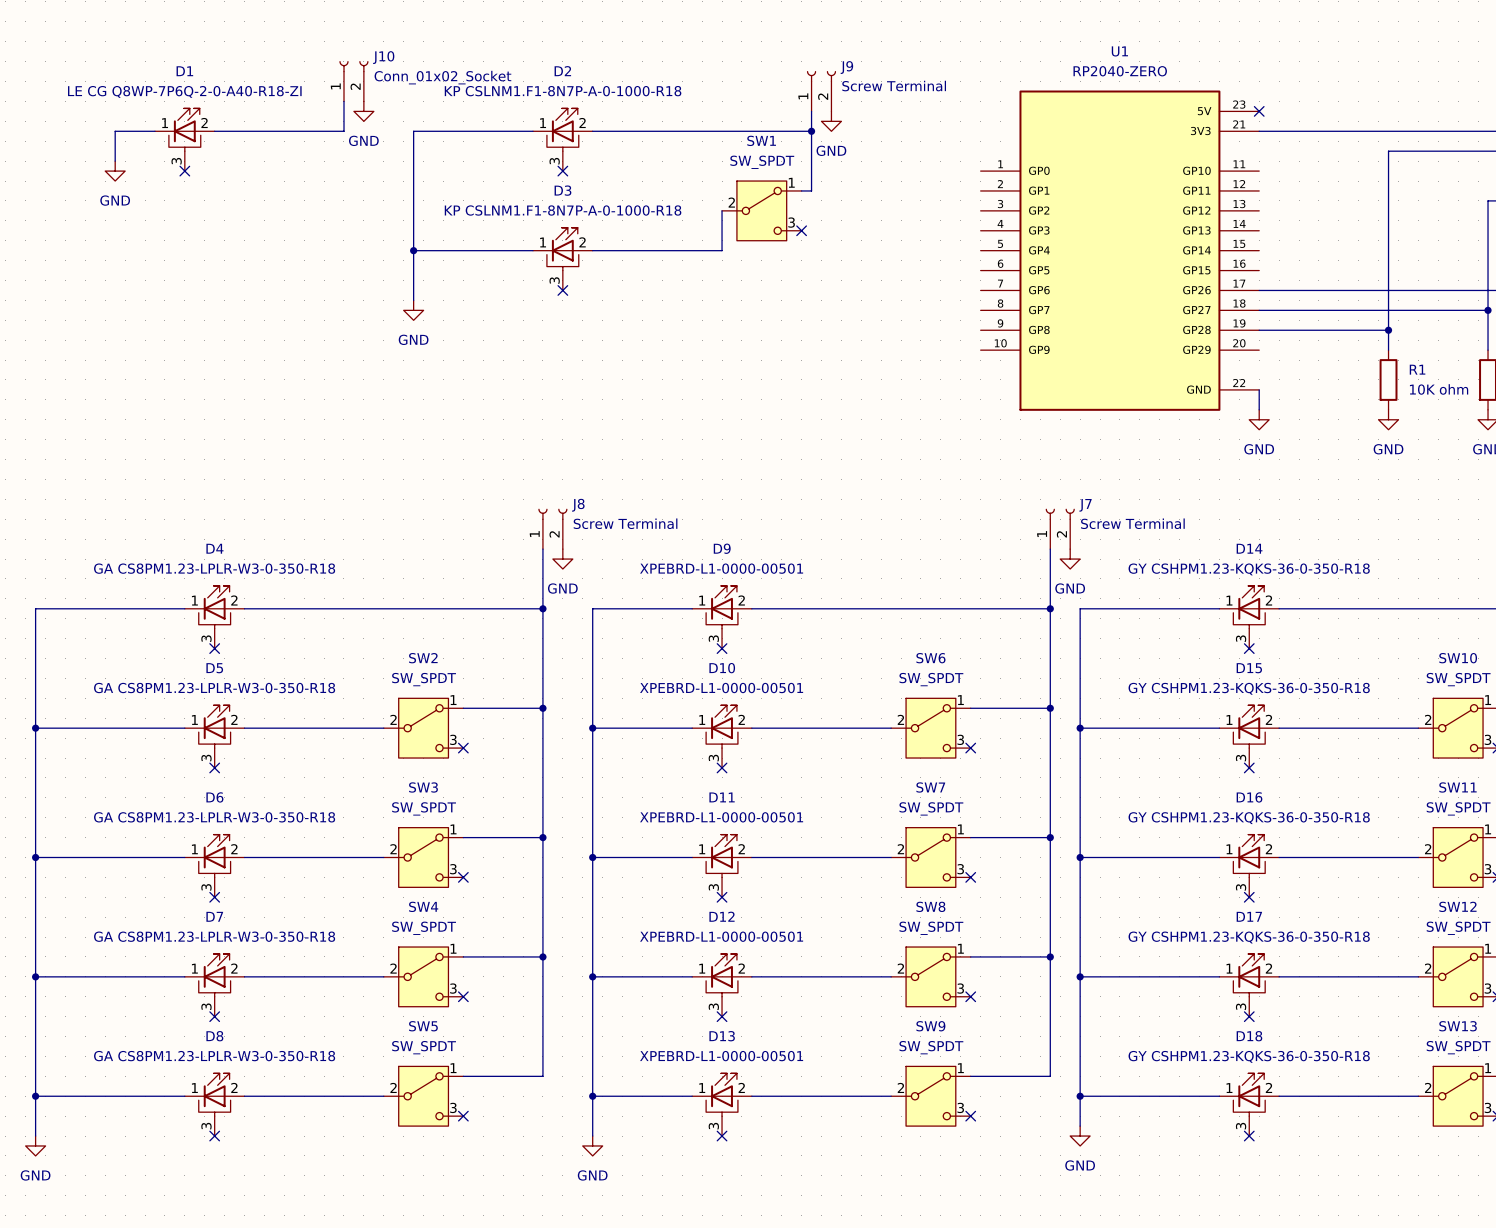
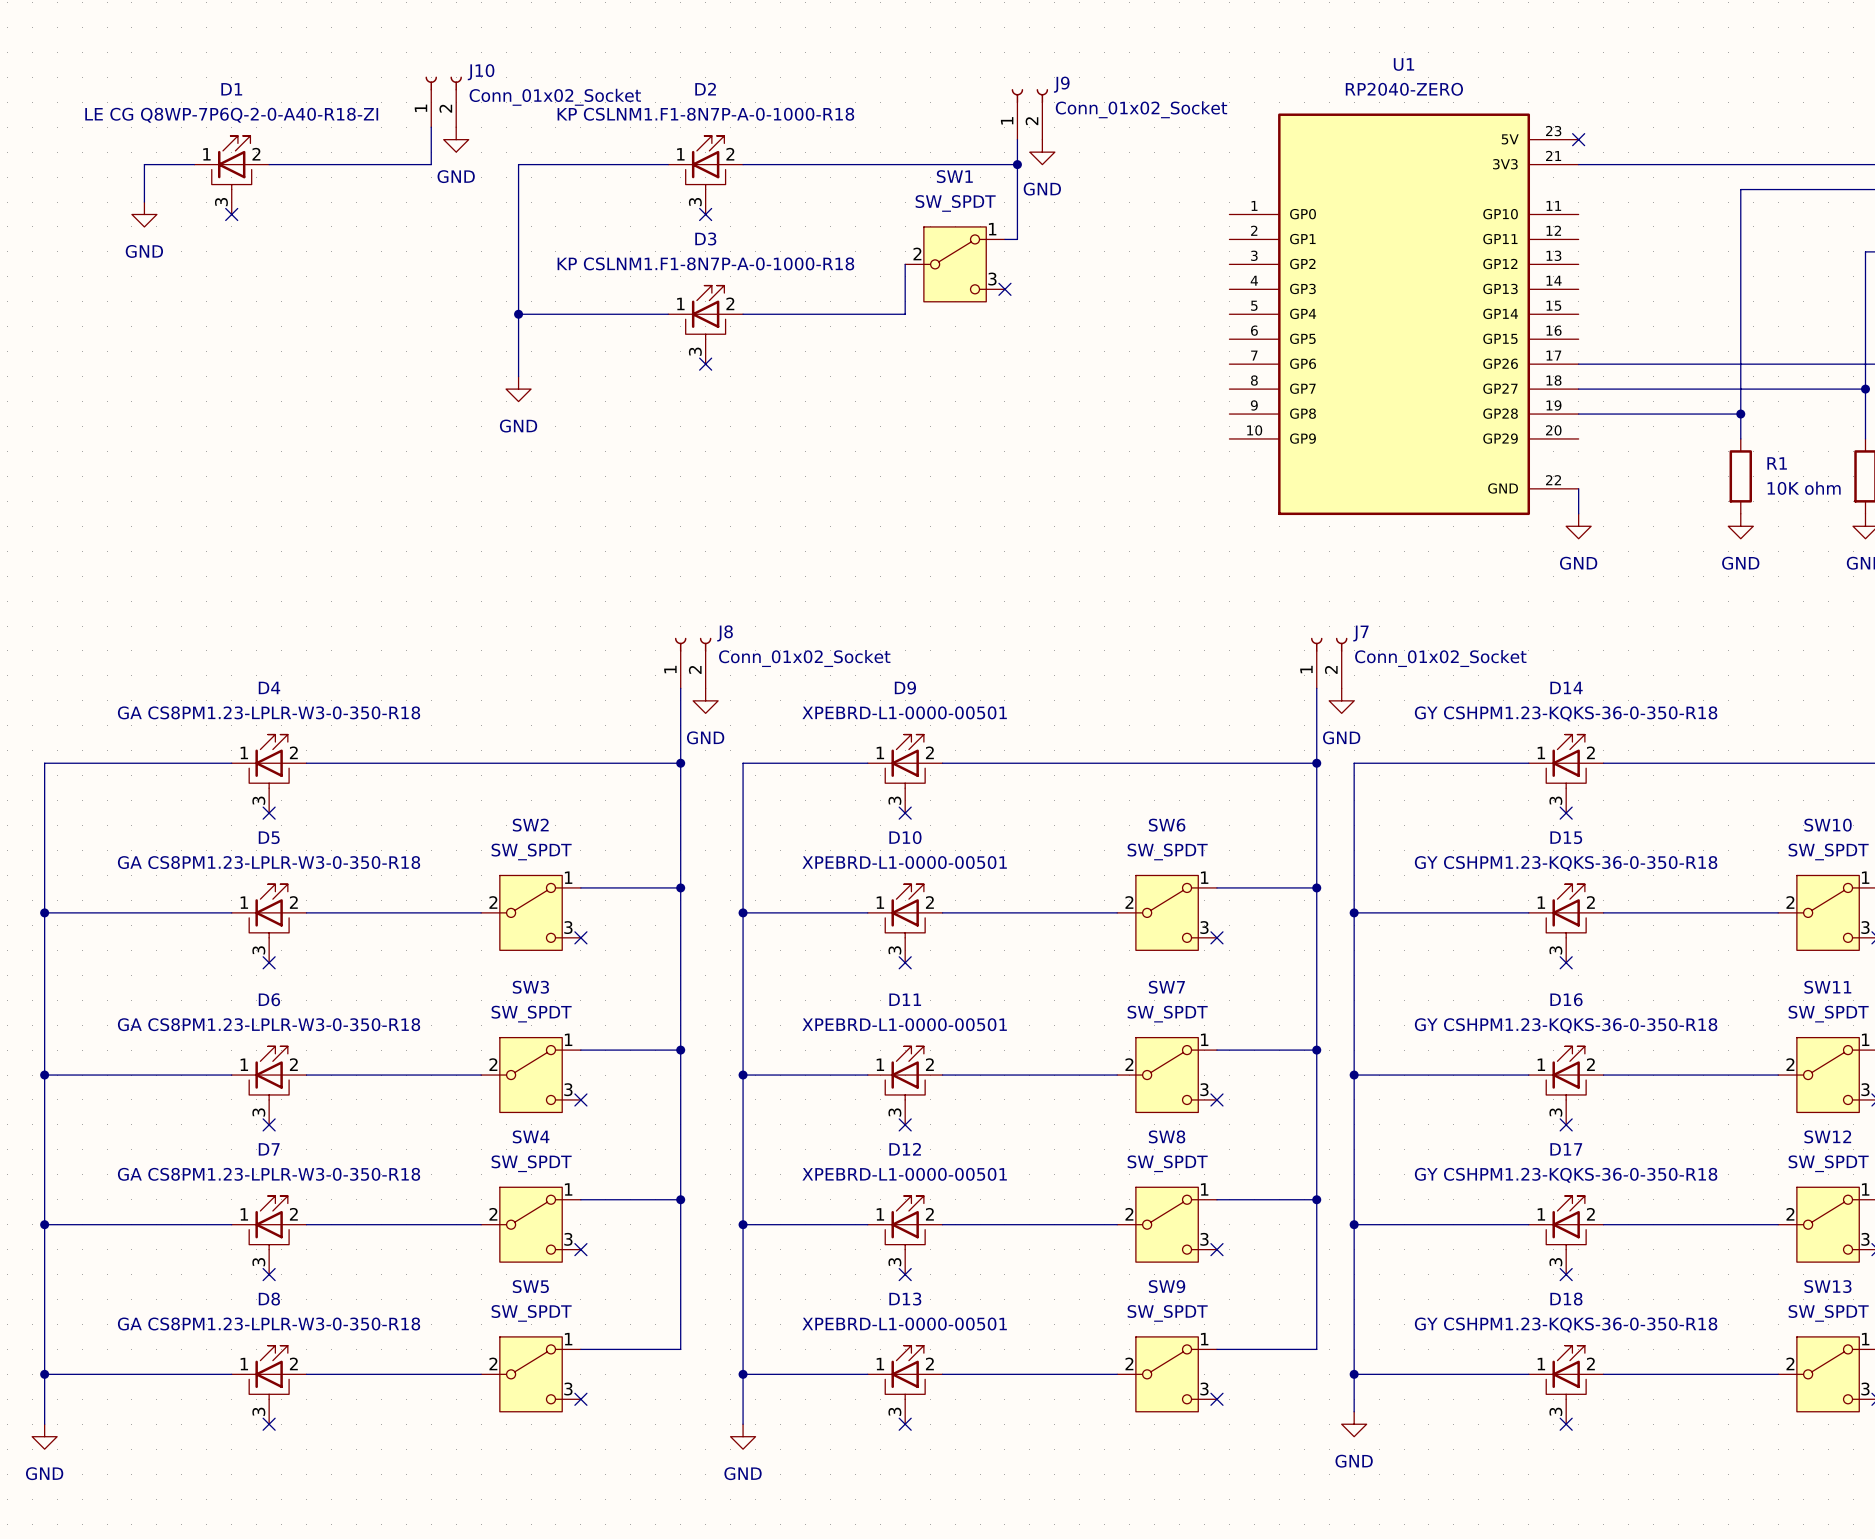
J9 value: Screw Terminal (894, 86) -> Conn_01x02_Socket (1141, 109)
J8 value: Screw Terminal (625, 523) -> Conn_01x02_Socket (804, 658)
J7 value: Screw Terminal (1132, 523) -> Conn_01x02_Socket (1440, 658)

